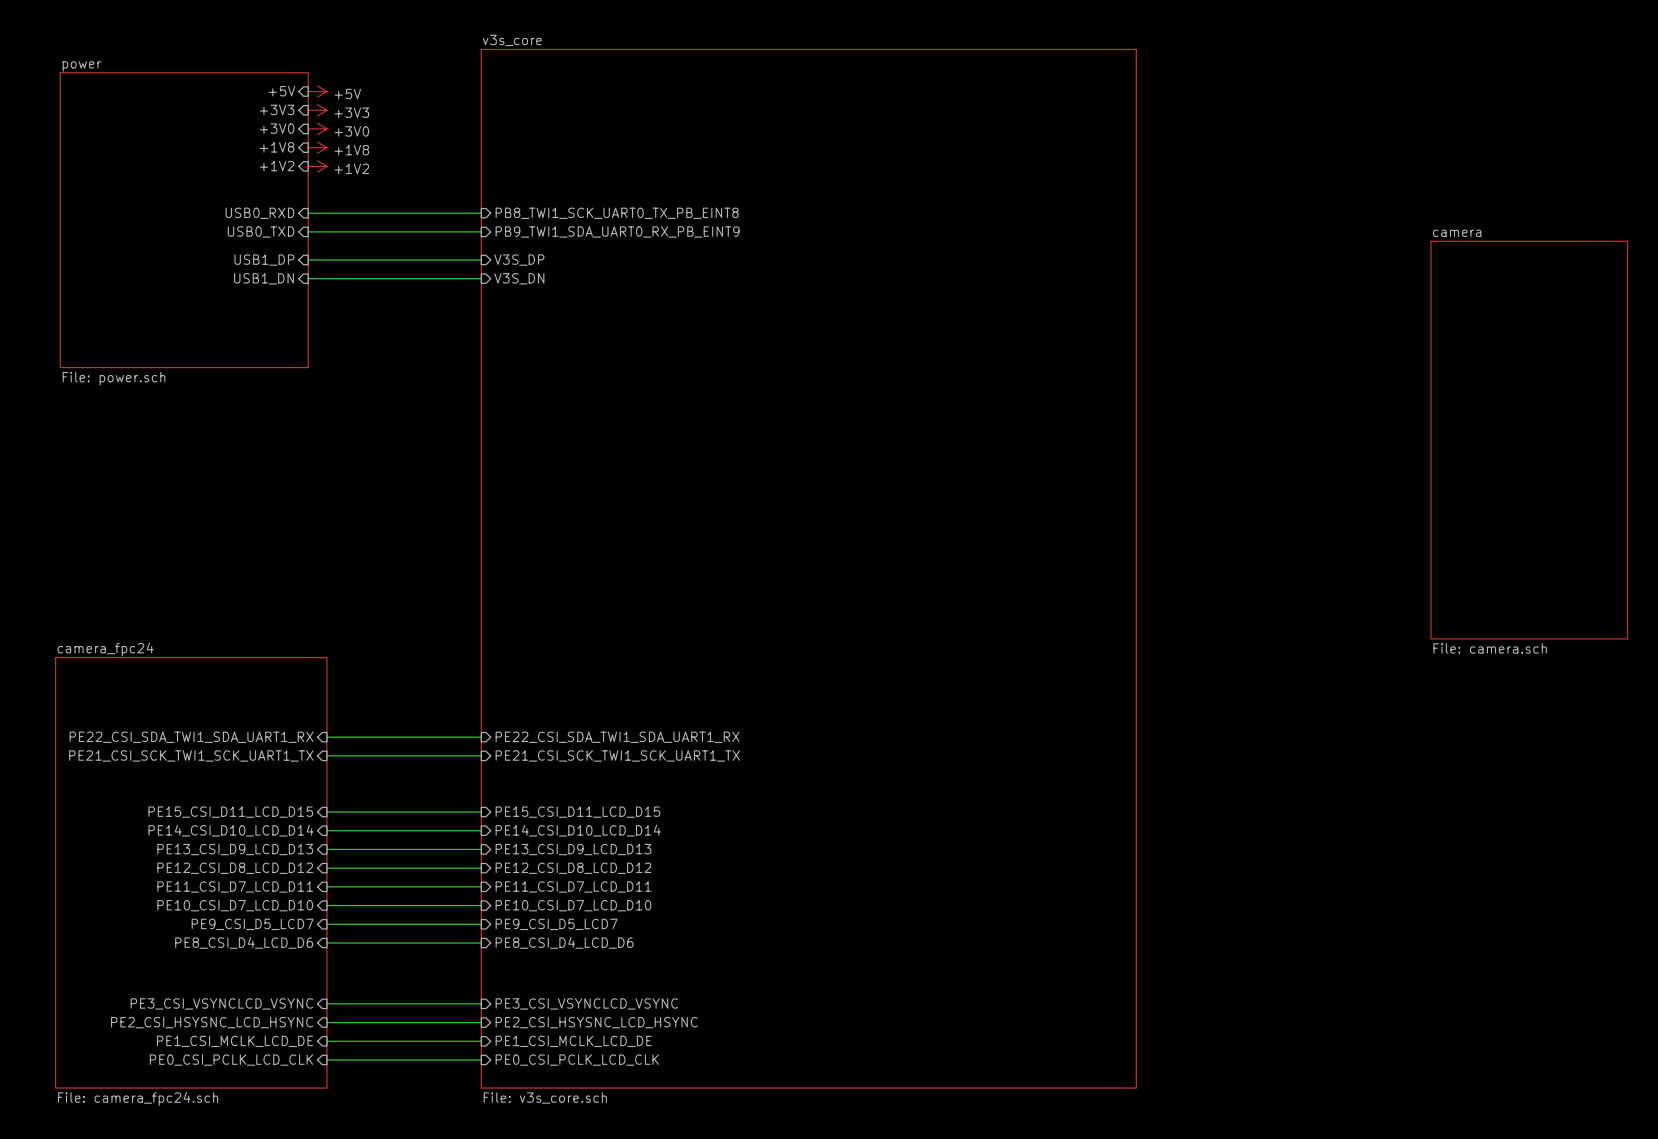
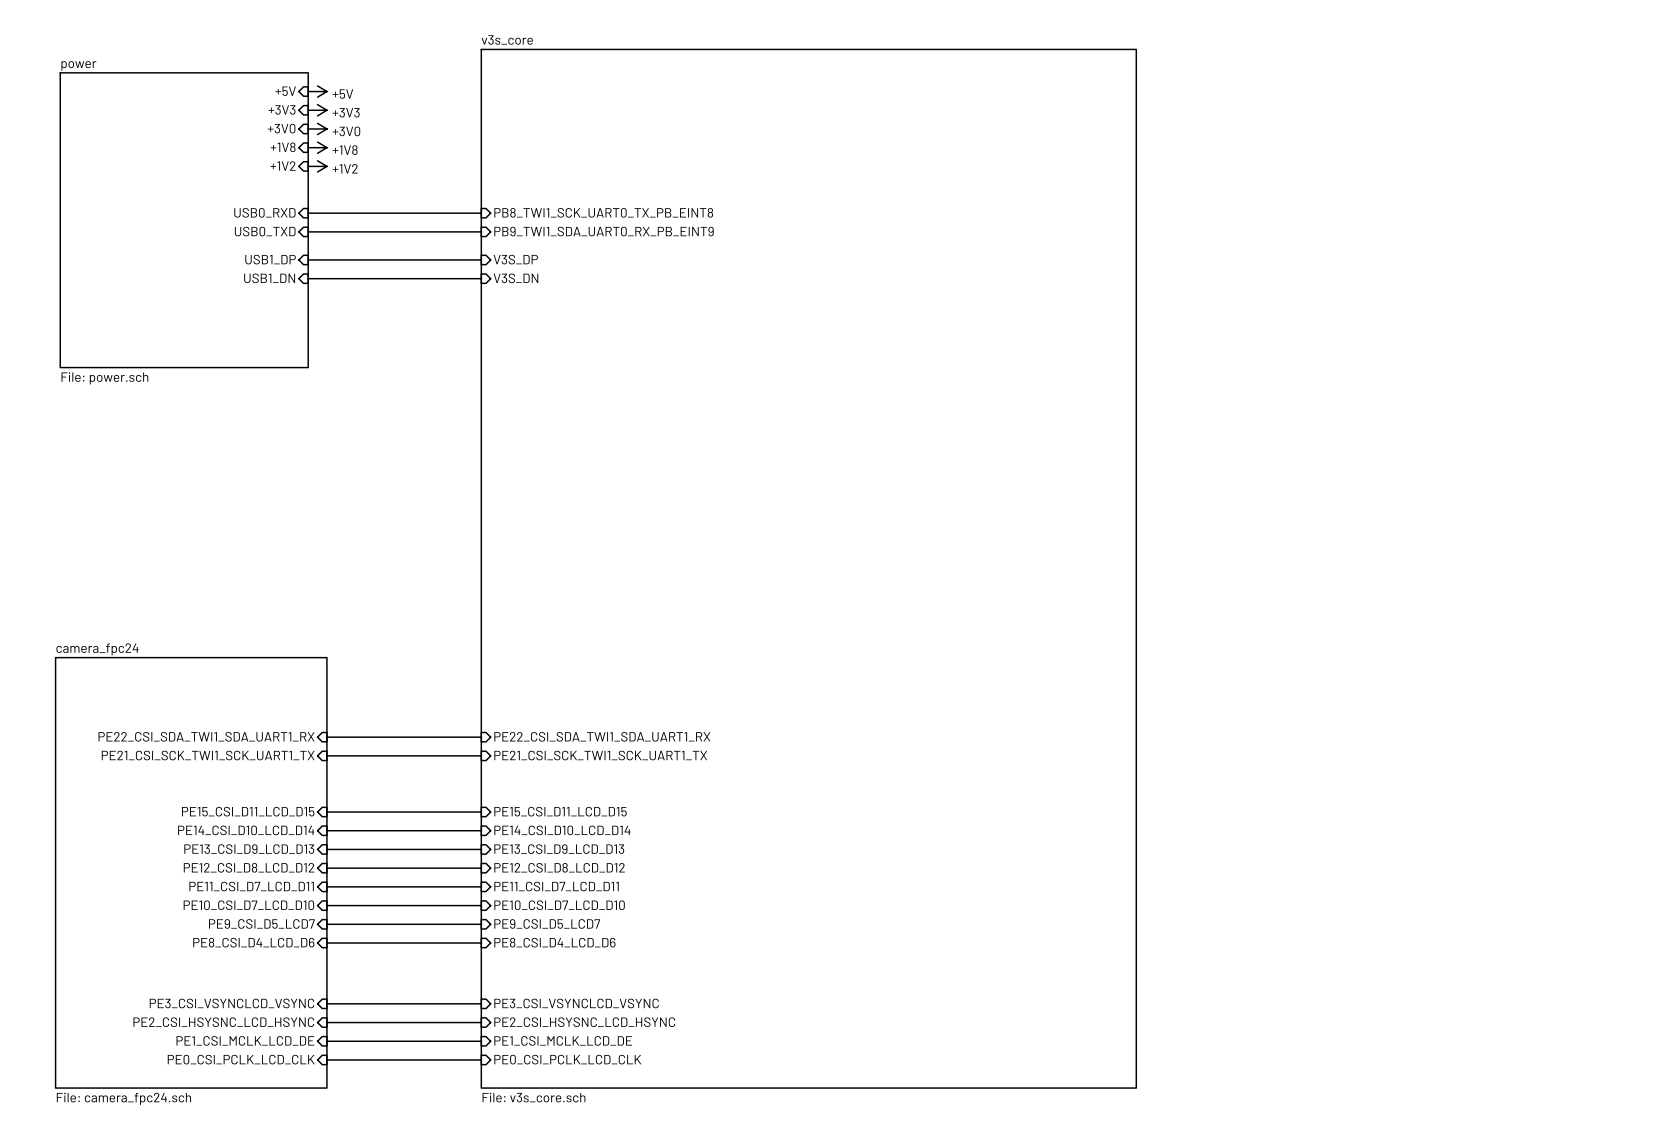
sheet camera: File: camera.sch (1529, 440) -> none

